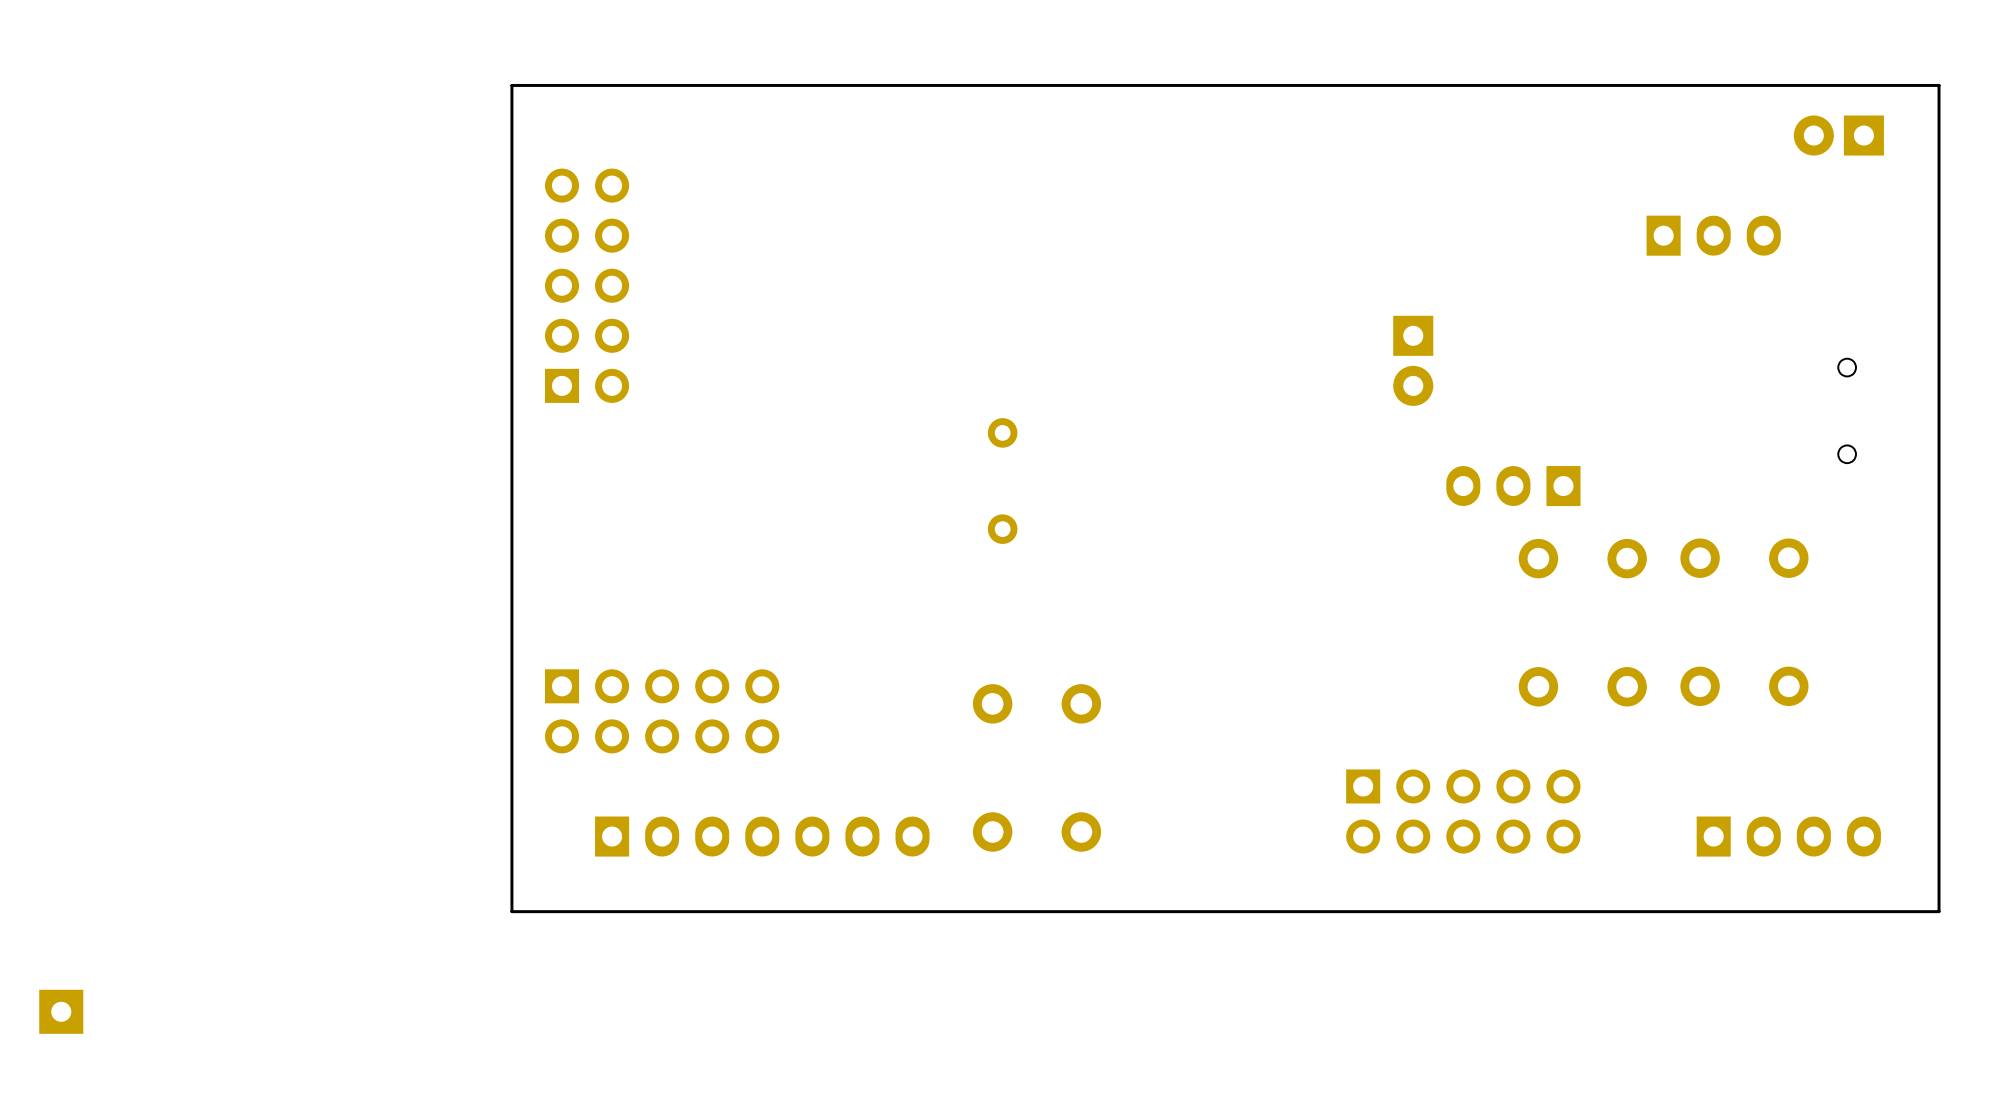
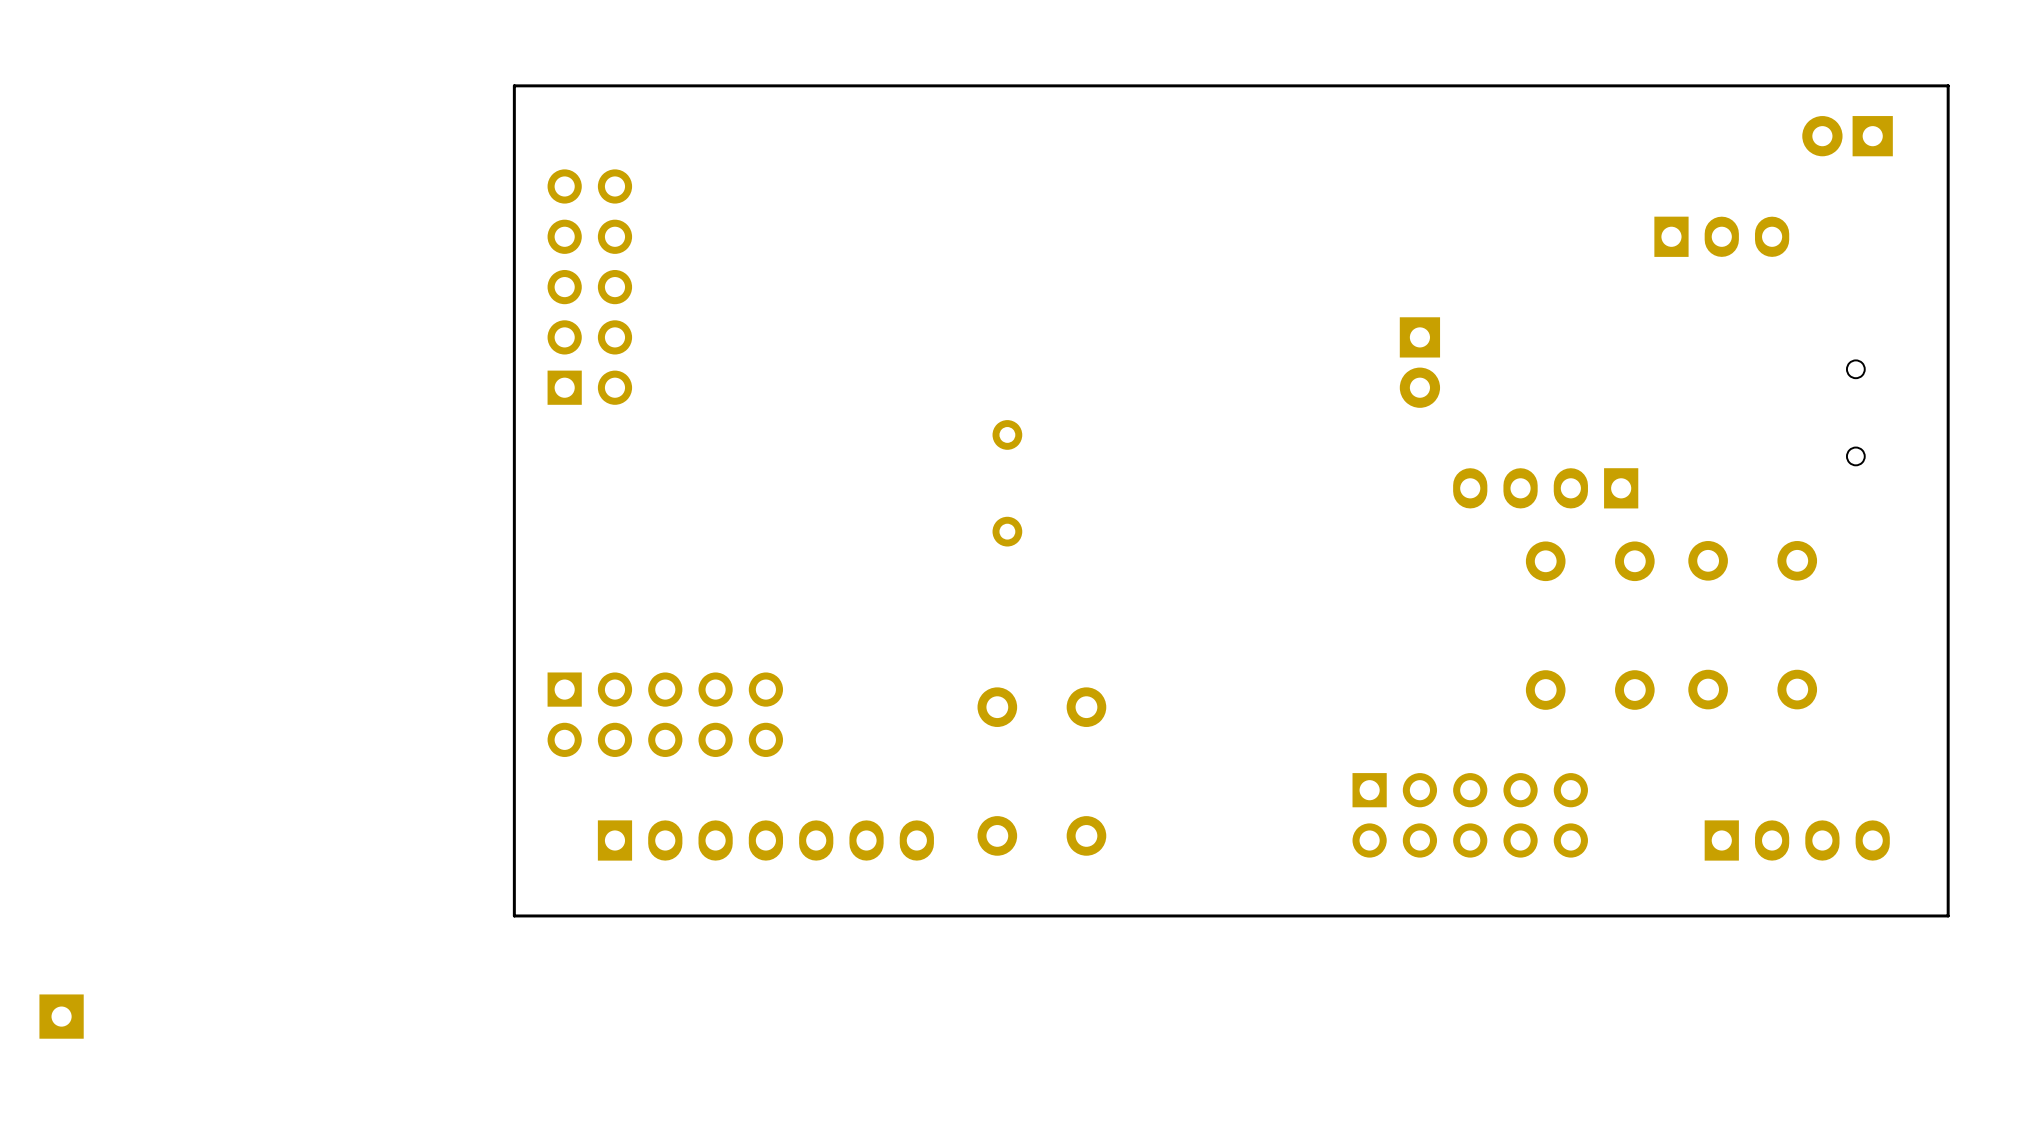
part: (1513, 486) -> none
part: none -> (1545, 488)

